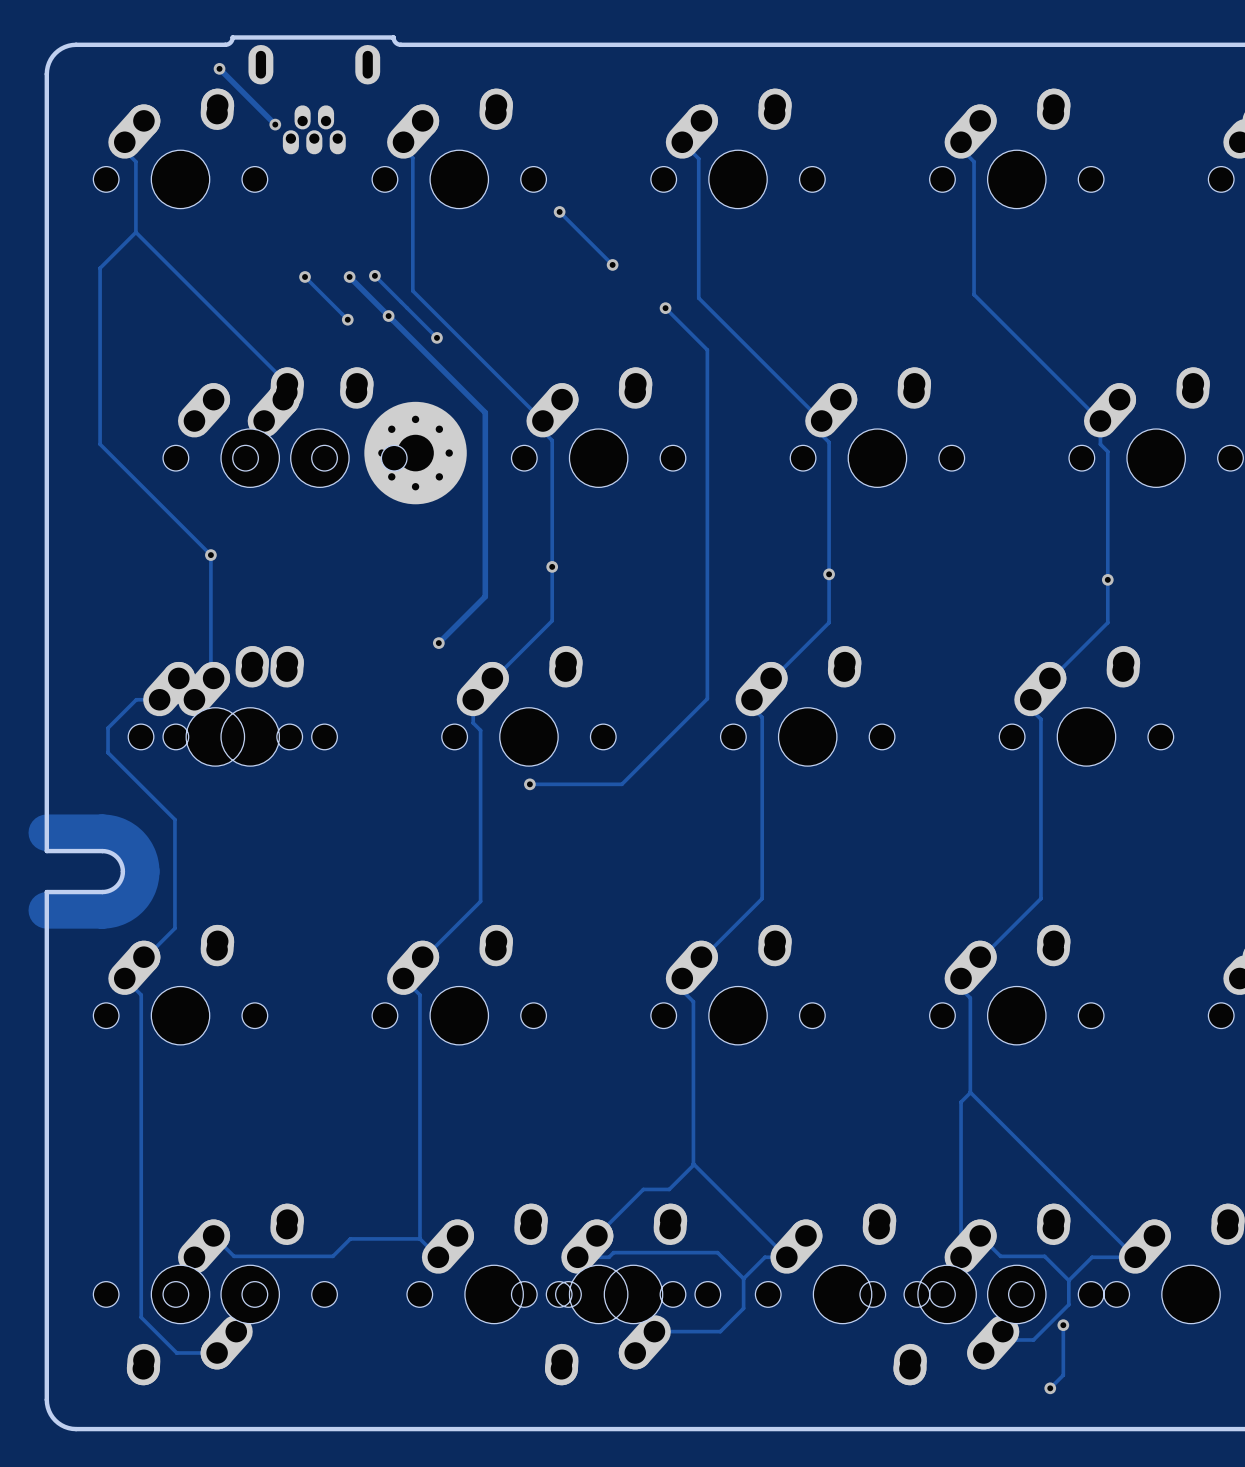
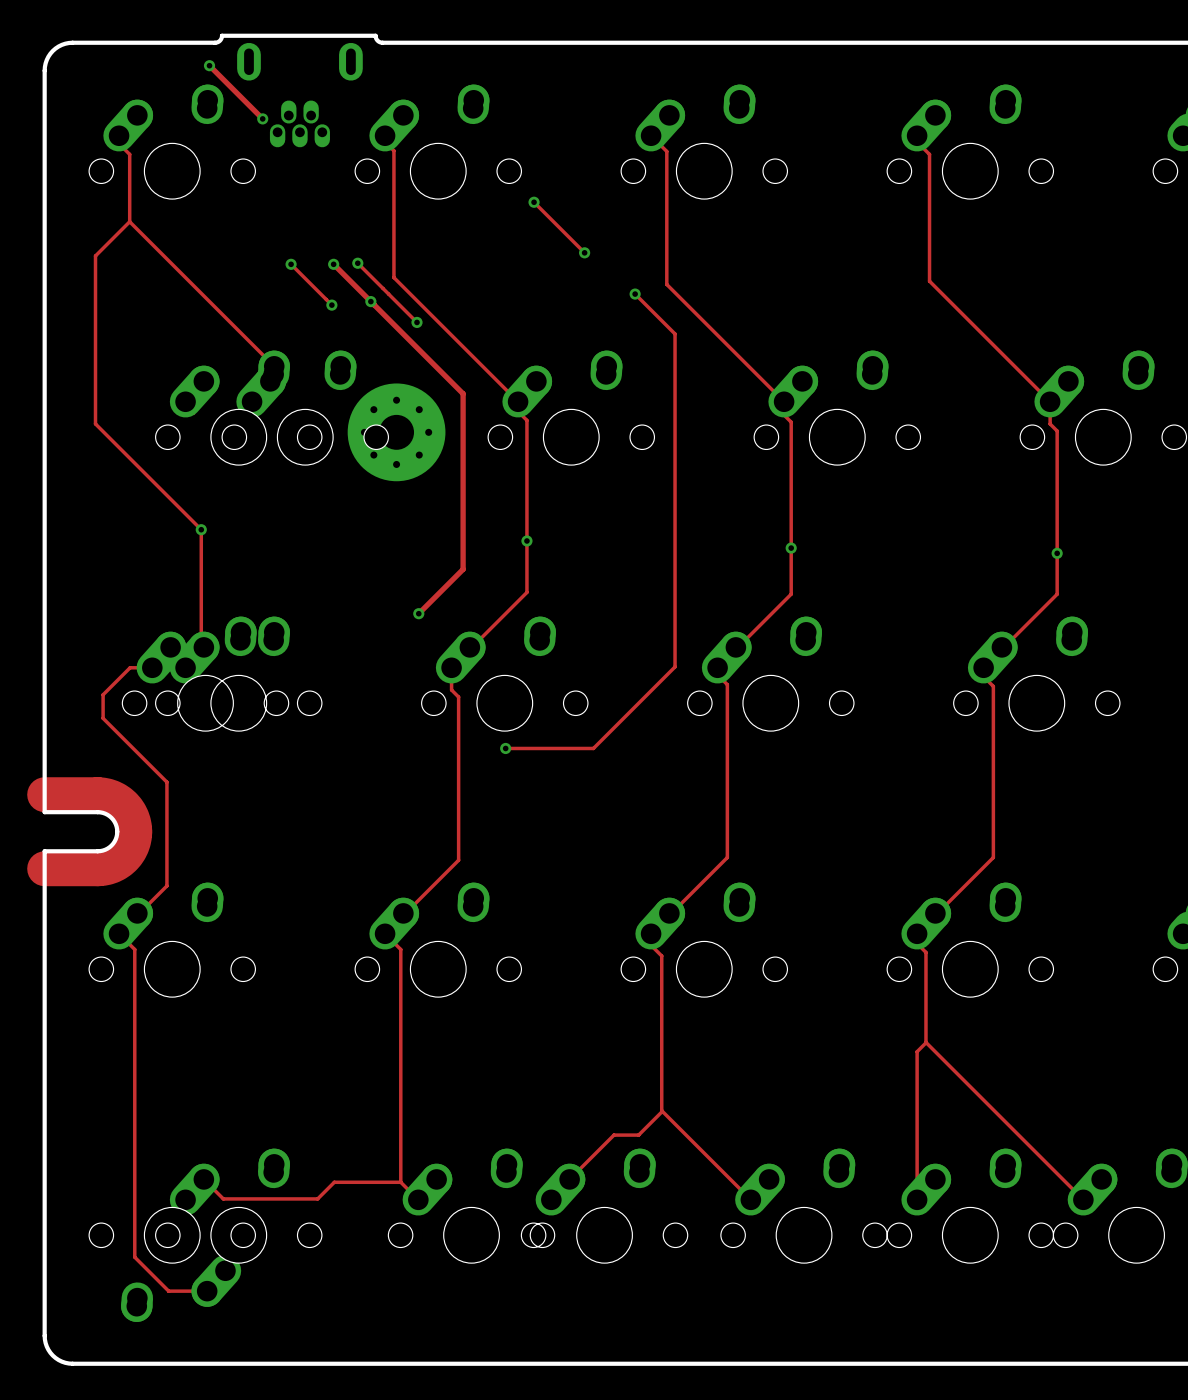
track: (980, 1235) (1000, 1256) (1044, 1256) (1068, 1280) -> none
track: (577, 1257) (608, 1257) (613, 1252) (717, 1252) (743, 1278) -> none
track: (786, 1257) (764, 1257) (743, 1278) -> none
track: (1135, 1257) (1092, 1257) (1068, 1280) -> none
track: (743, 1278) (743, 1308) (720, 1331) (654, 1331) -> none
track: (1068, 1280) (1068, 1304) (1033, 1339) (1016, 1339) (1008, 1331) (1002, 1331) -> none
part: (598, 1325) -> none
part: (947, 1325) -> none
track: (1063, 1325) (1063, 1375) (1050, 1388) -> none
via: (1063, 1325) -> none
via: (1050, 1388) -> none

